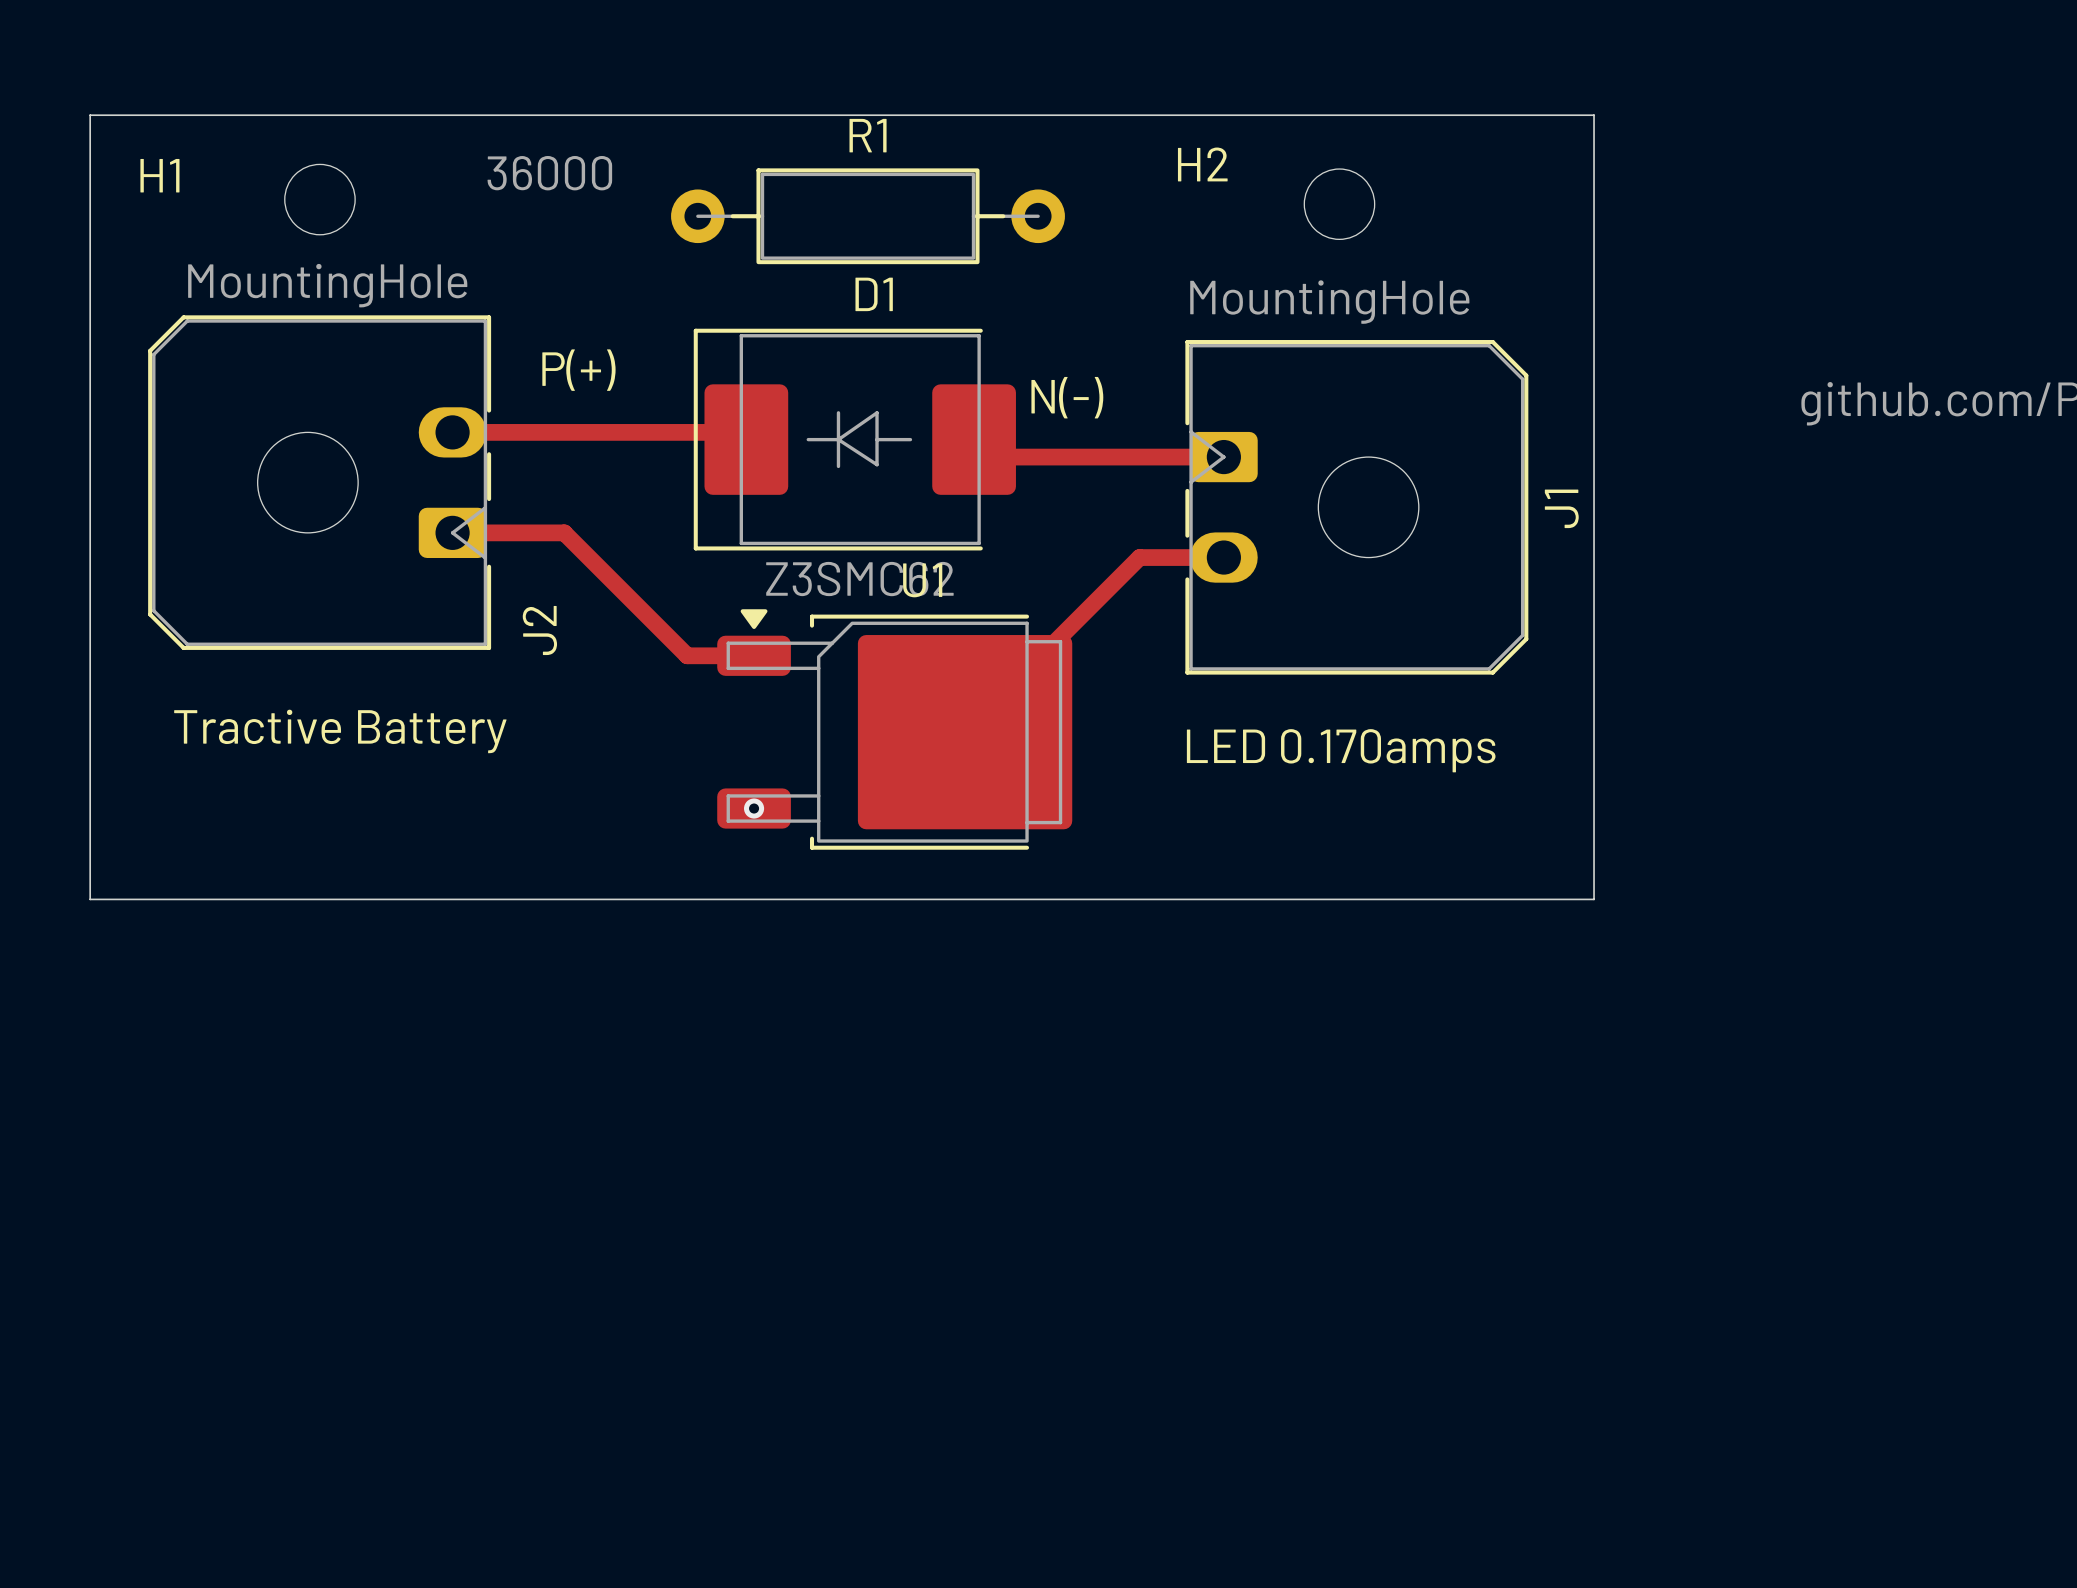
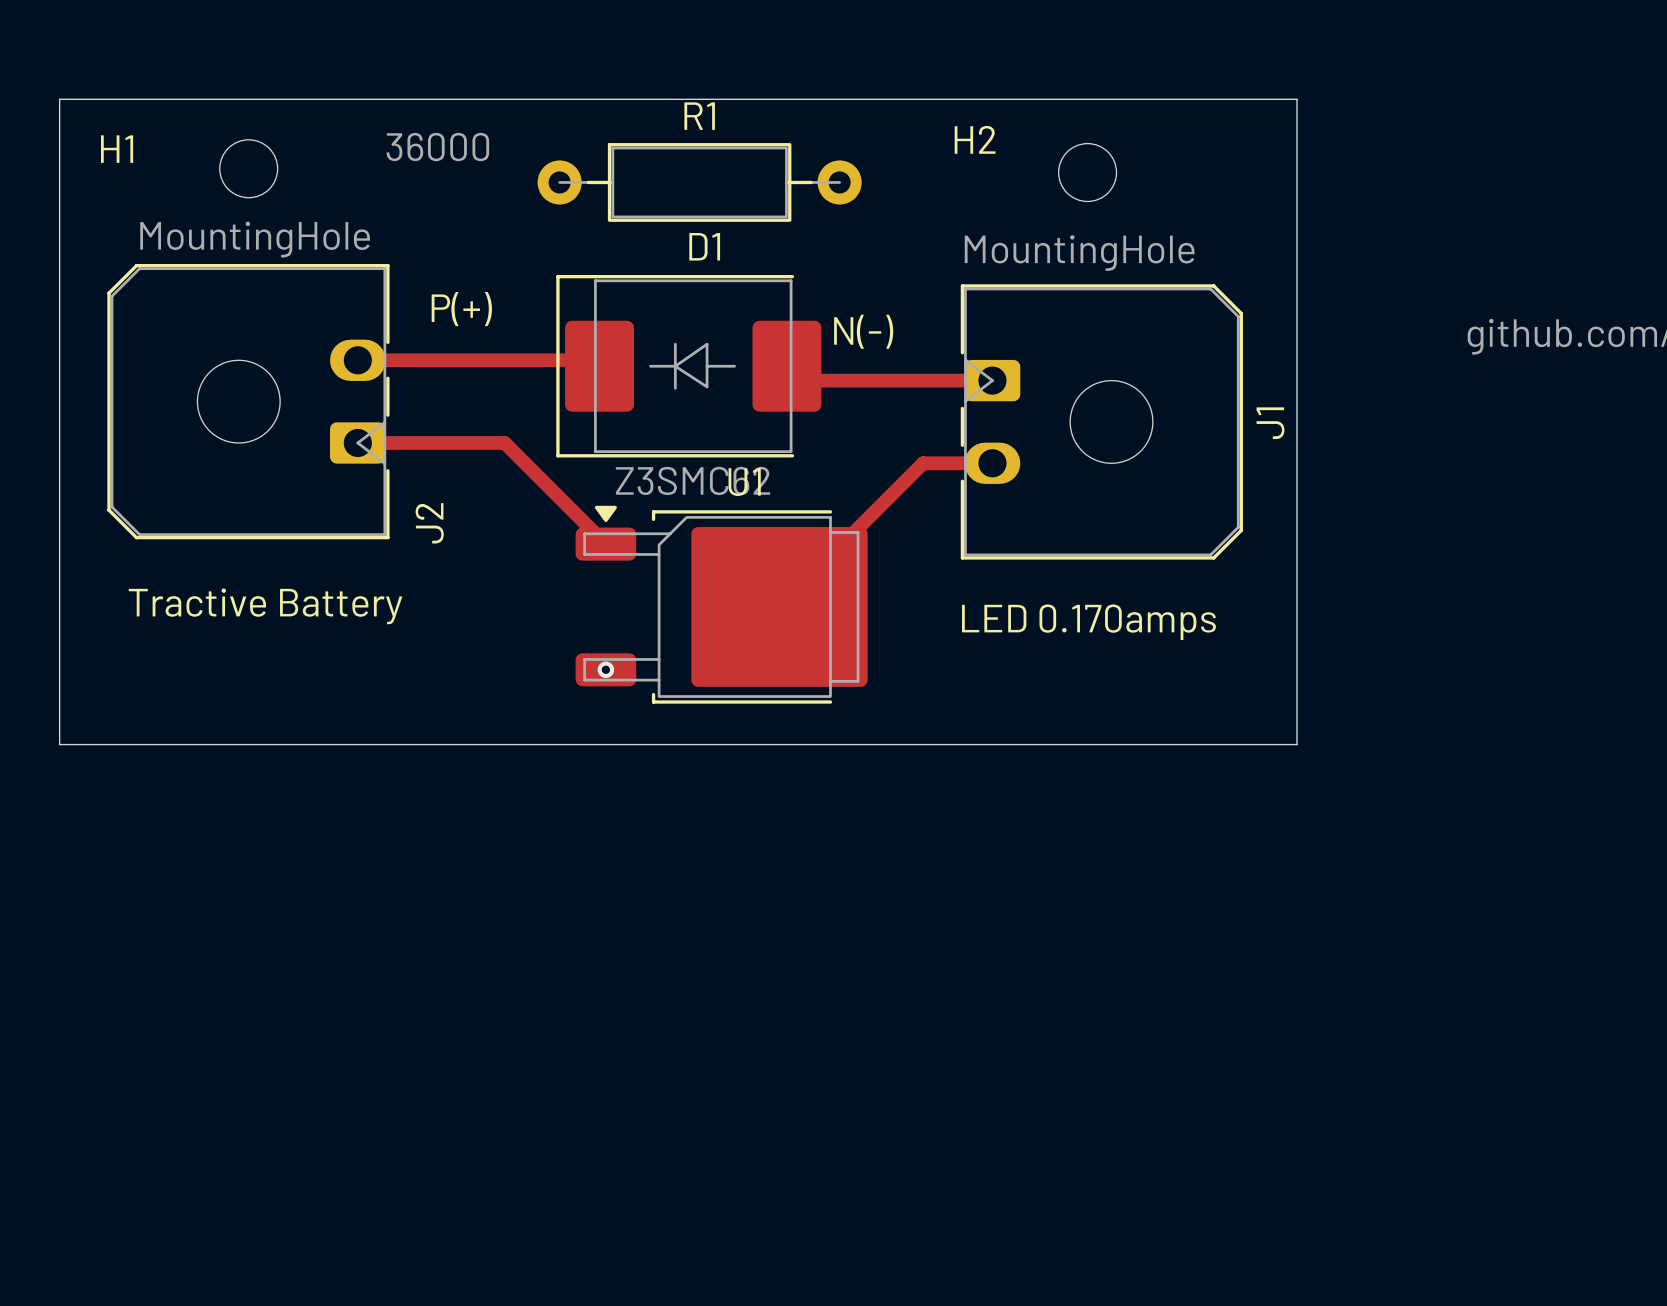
track: (564, 532) (687, 655) (754, 655) -> (449, 442) (504, 442) (605, 544)

